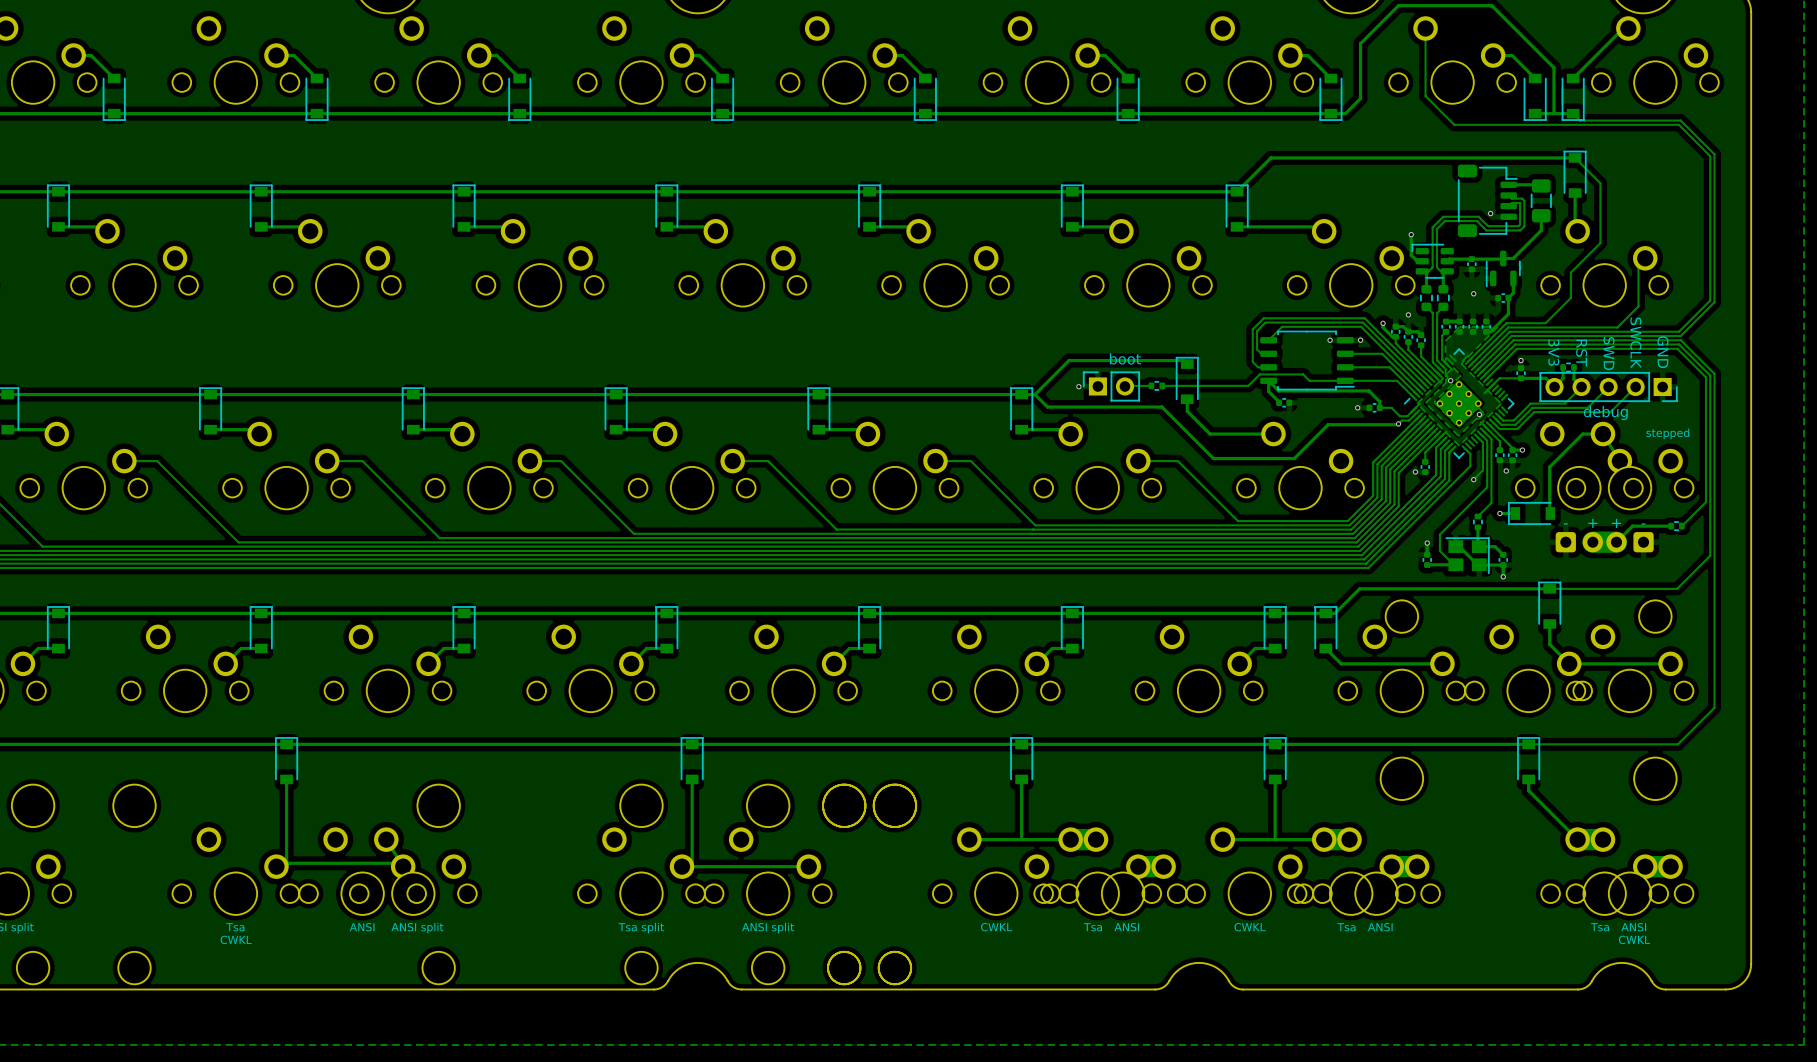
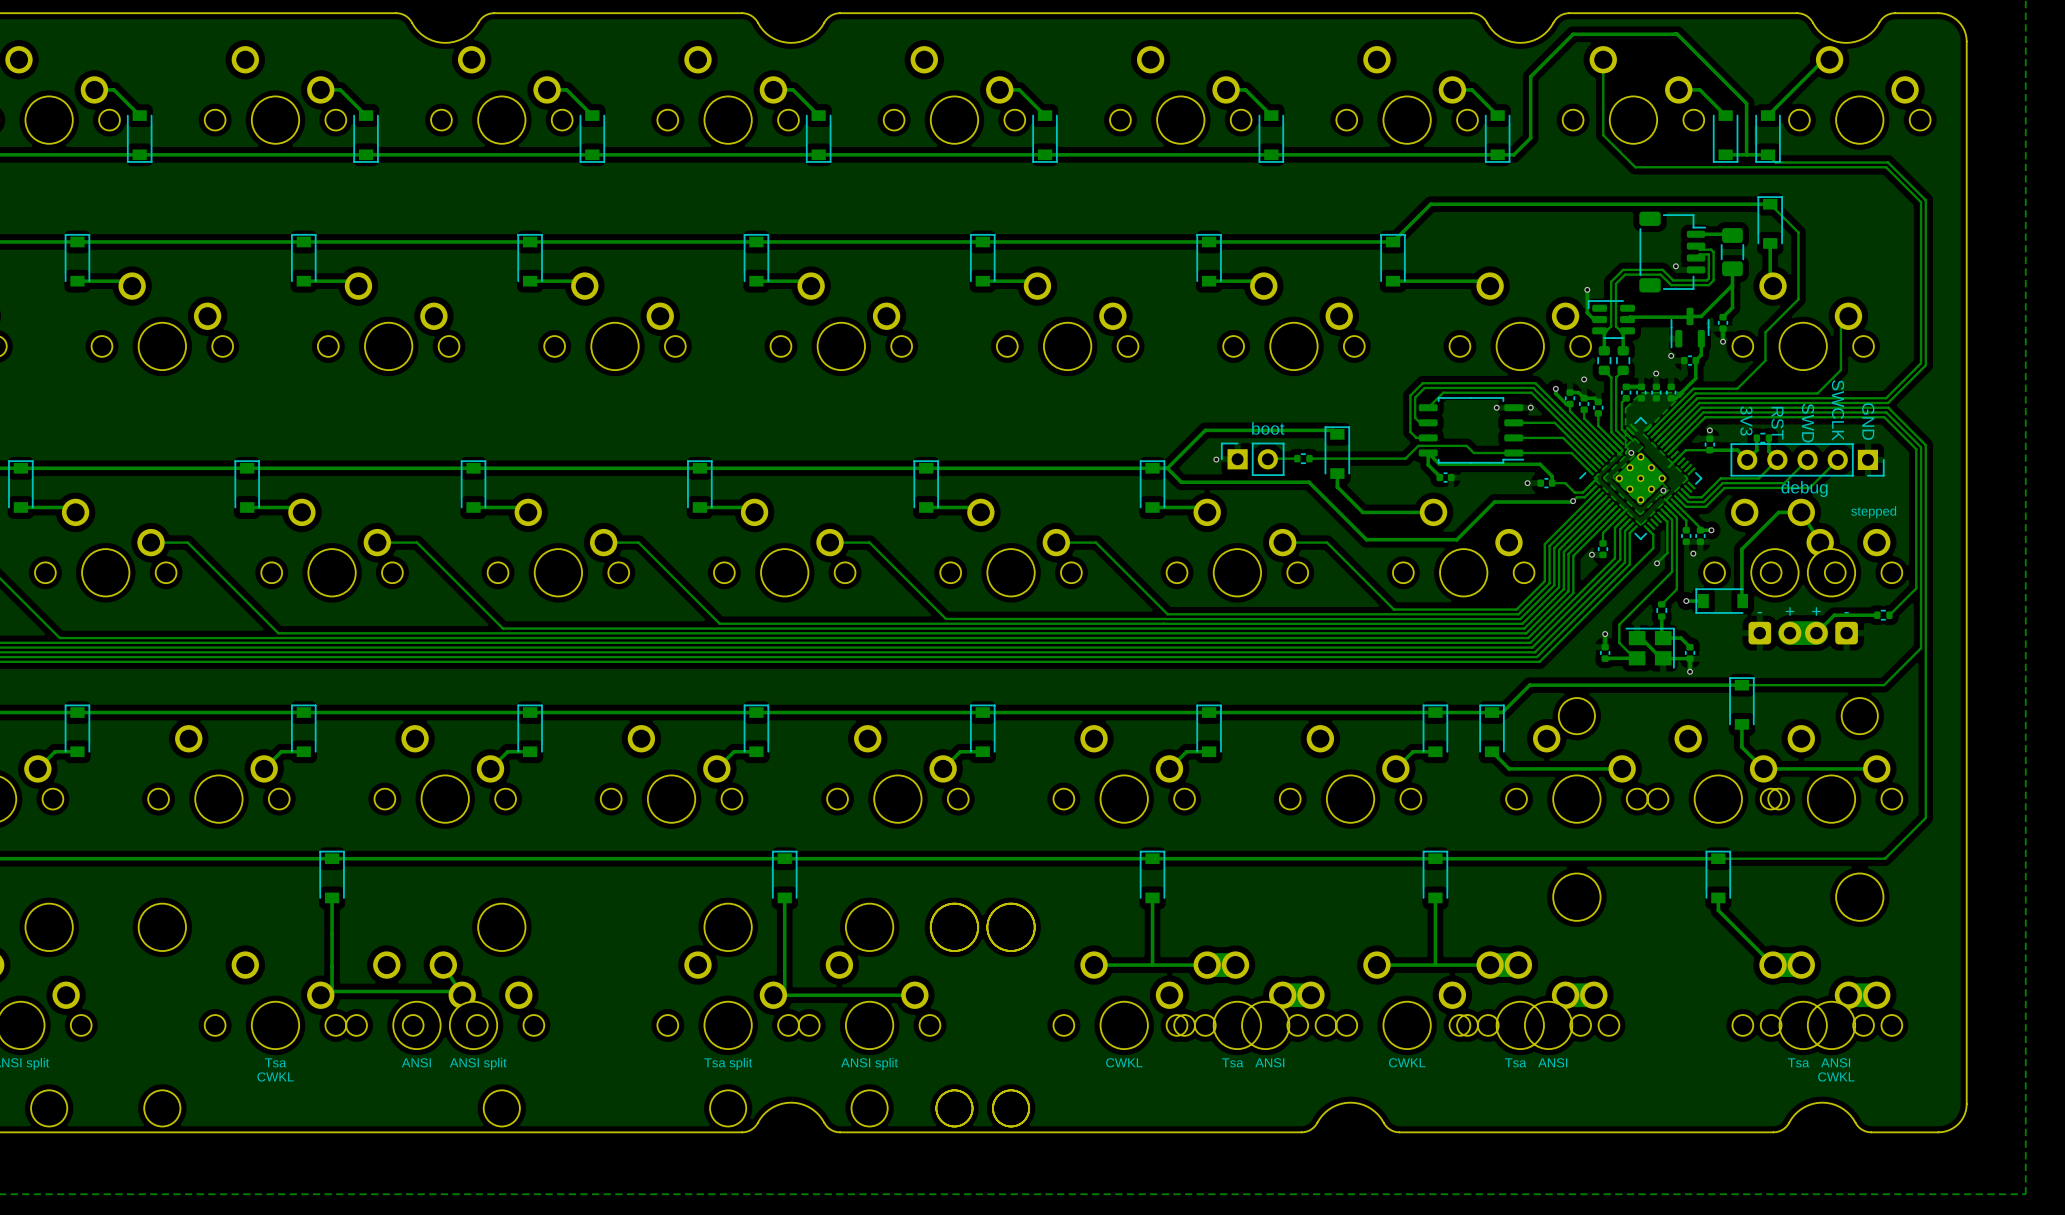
track: none -> (1732, 285) (1732, 307) (1723, 317)
part position: (1471, 264) -> (1723, 322)
track: none -> (1723, 328) (1723, 341)
via: none -> (1723, 341)
via: (1473, 293) -> none
via: none -> (1671, 355)
via: none -> (1656, 373)

